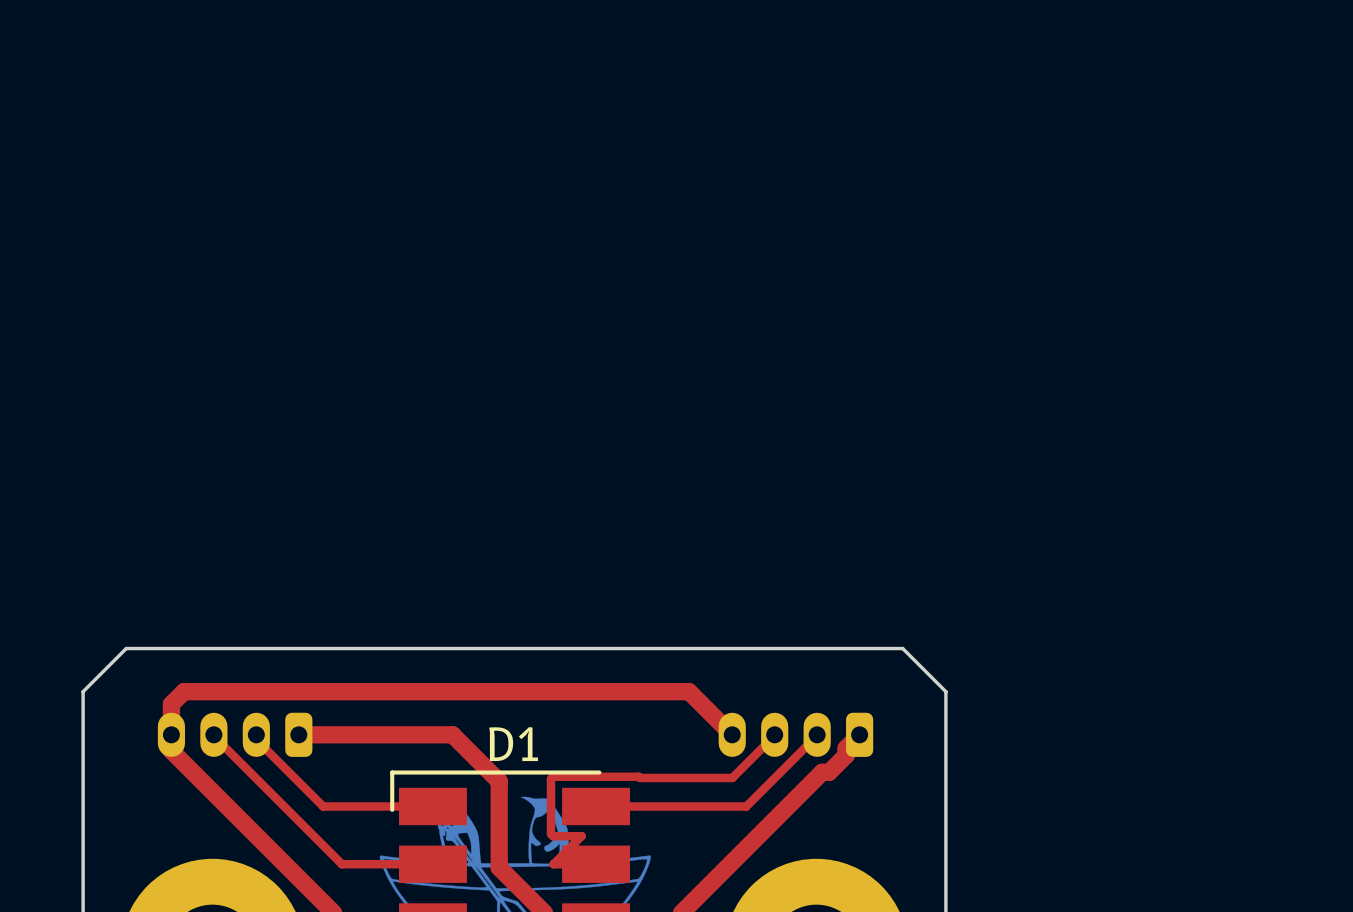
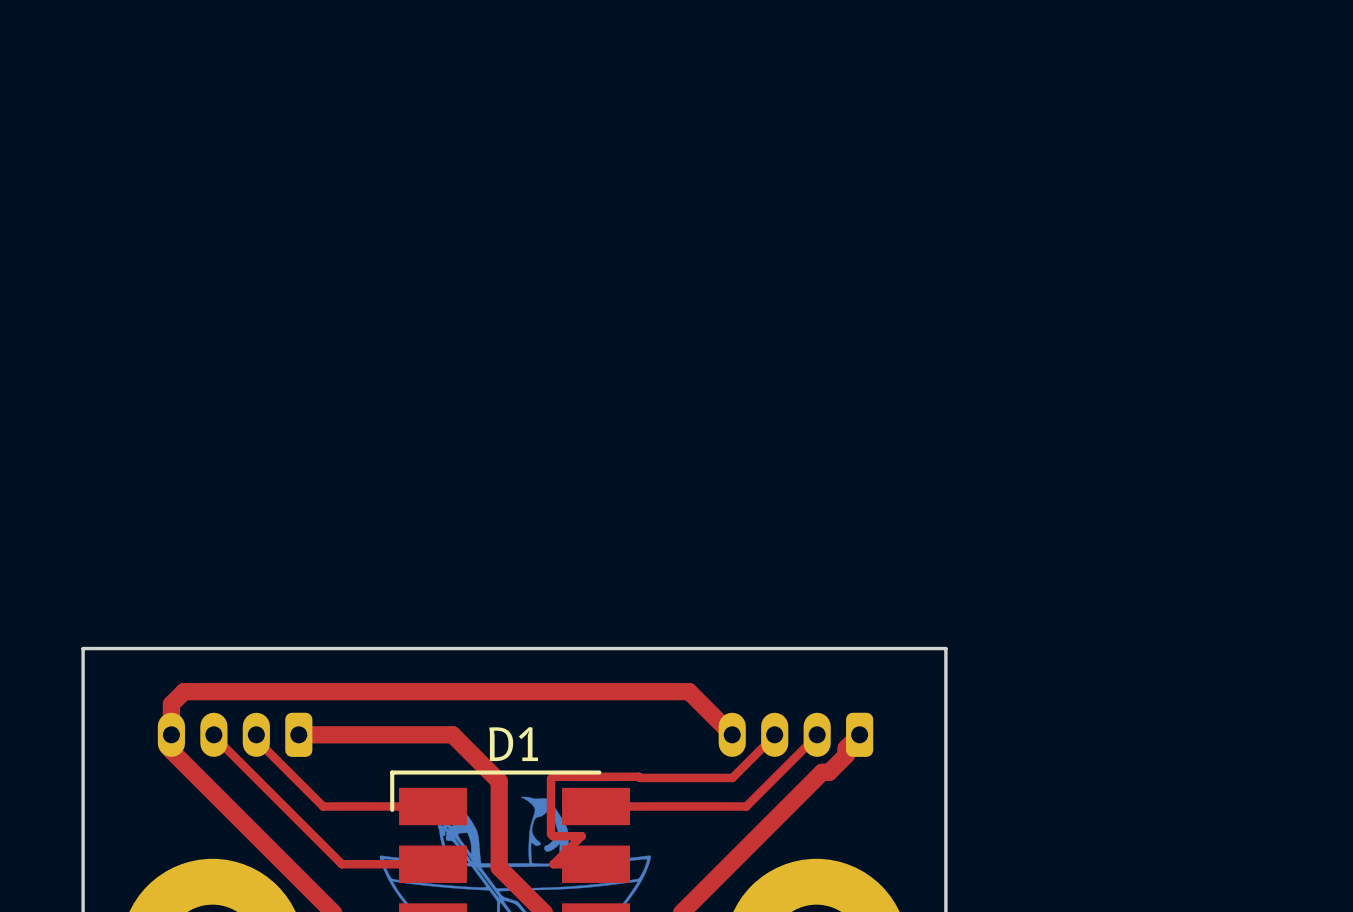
board edge: (126, 648) (83, 691) -> (126, 648) (83, 648) (83, 691)
board edge: (902, 648) (945, 691) -> (902, 648) (945, 648) (945, 691)

